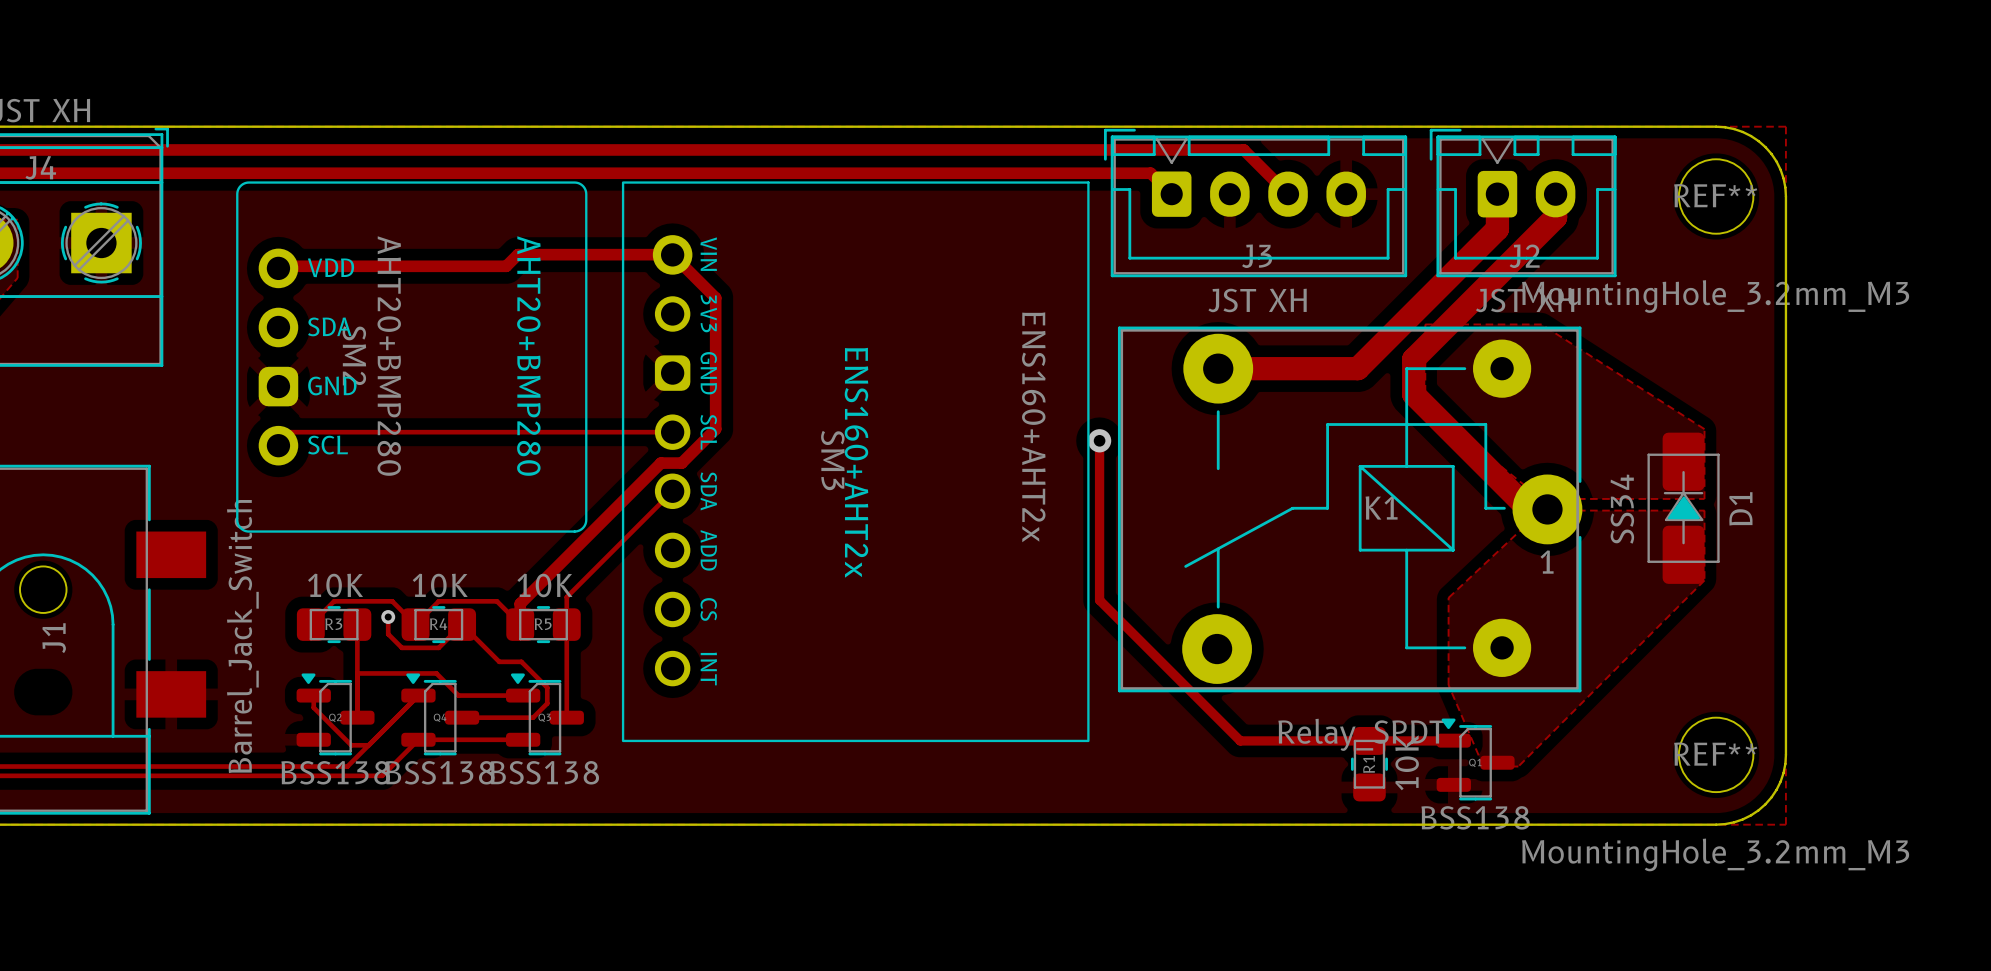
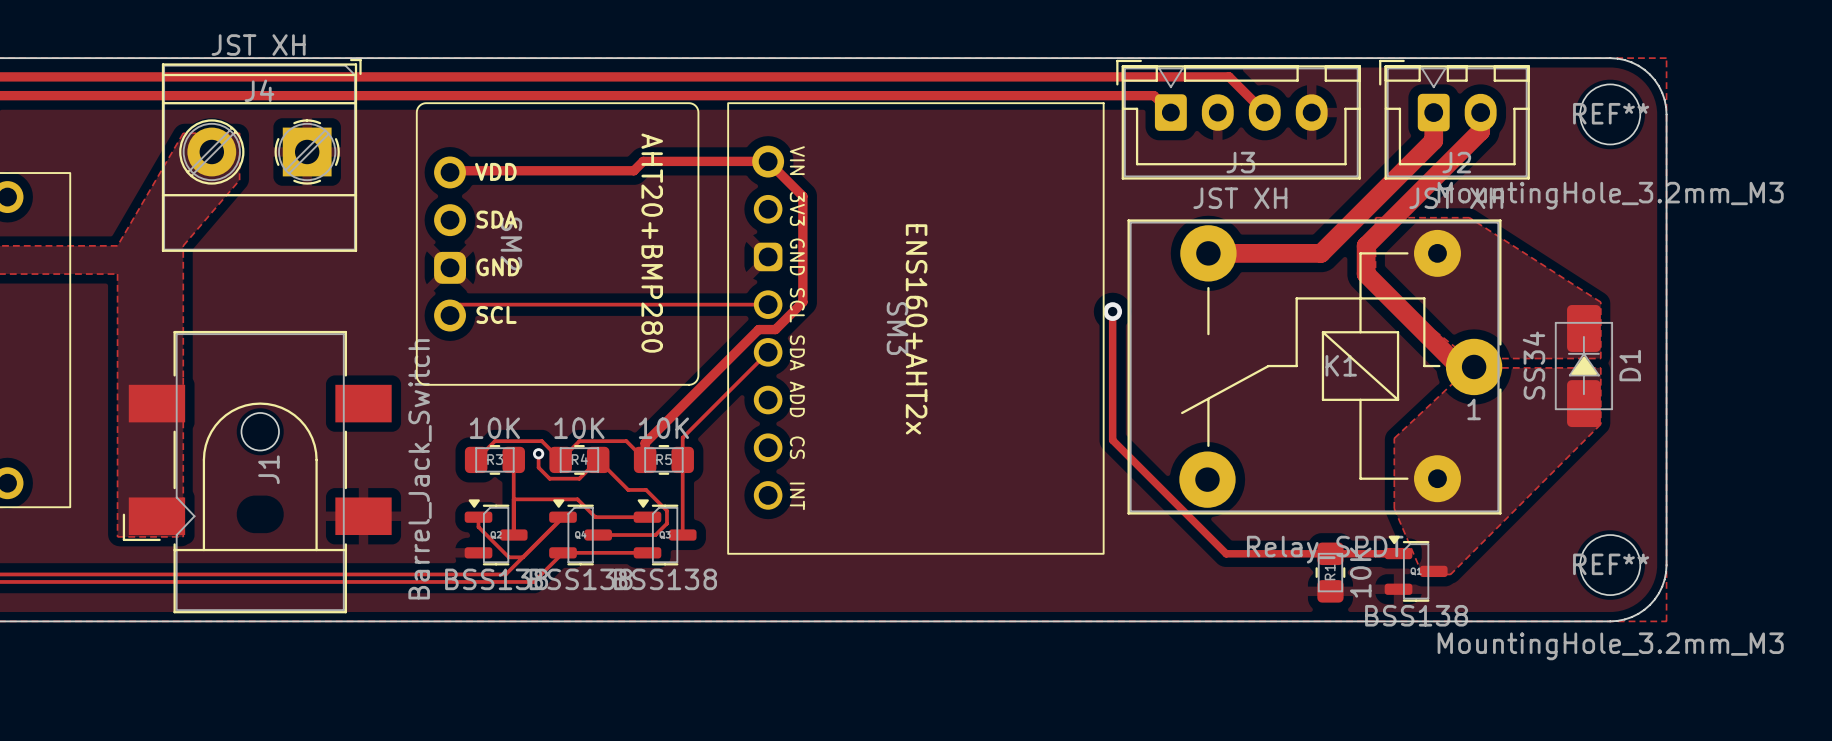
SM2 value: AHT20+BMP280 (389, 356) -> none
SM3 value: ENS160+AHT2x (1033, 427) -> none

